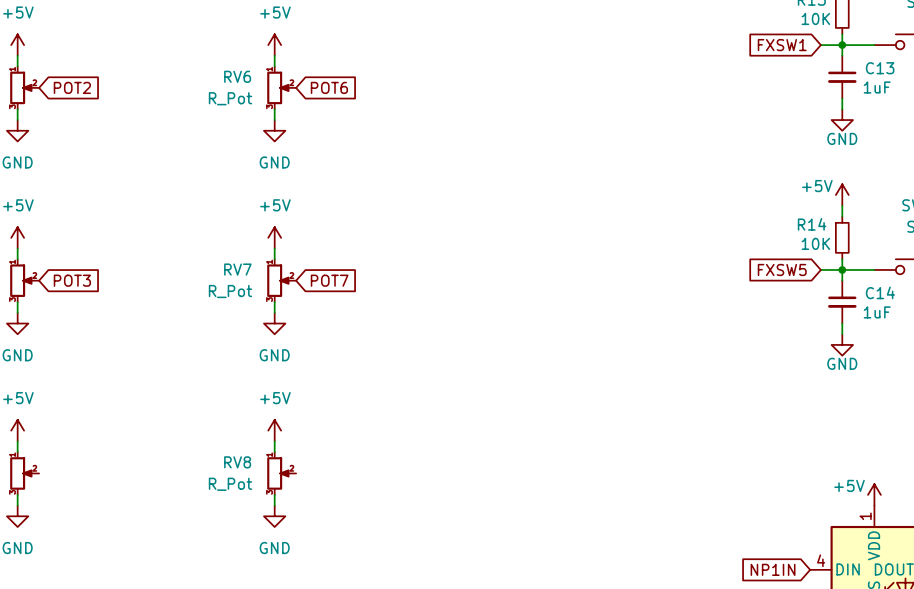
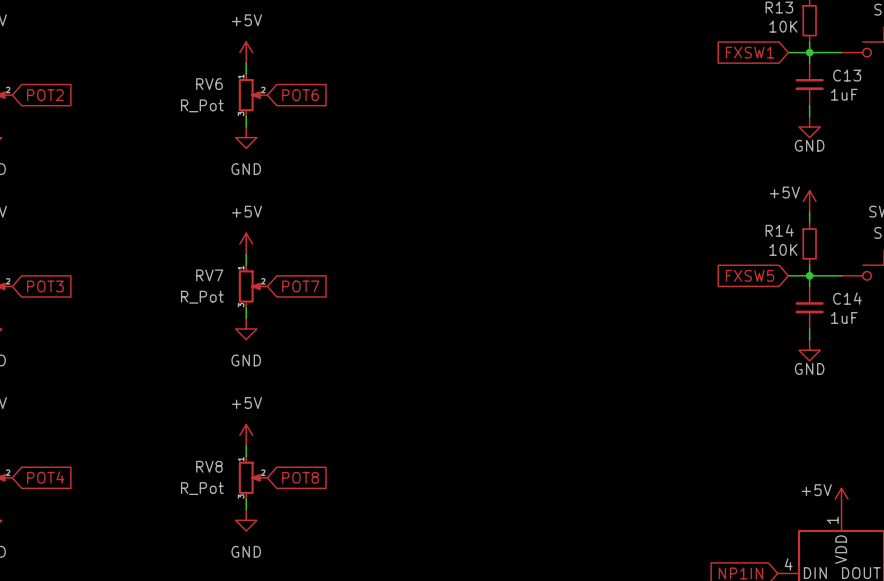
global label: none -> POT4 (45, 477)
global label: none -> POT8 (300, 477)

